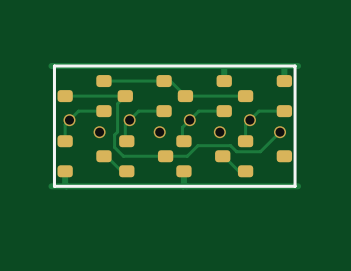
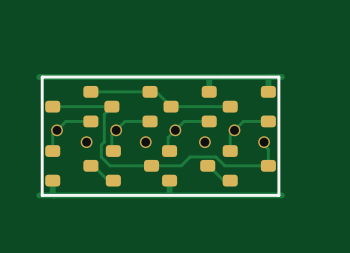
track: (280, 132) (260, 151) (236, 151) (230, 145) (197, 145) (187, 156) -> (264, 145) (268, 149) (268, 165) (224, 165) (215, 156) (190, 156) (181, 165) (172, 165)

